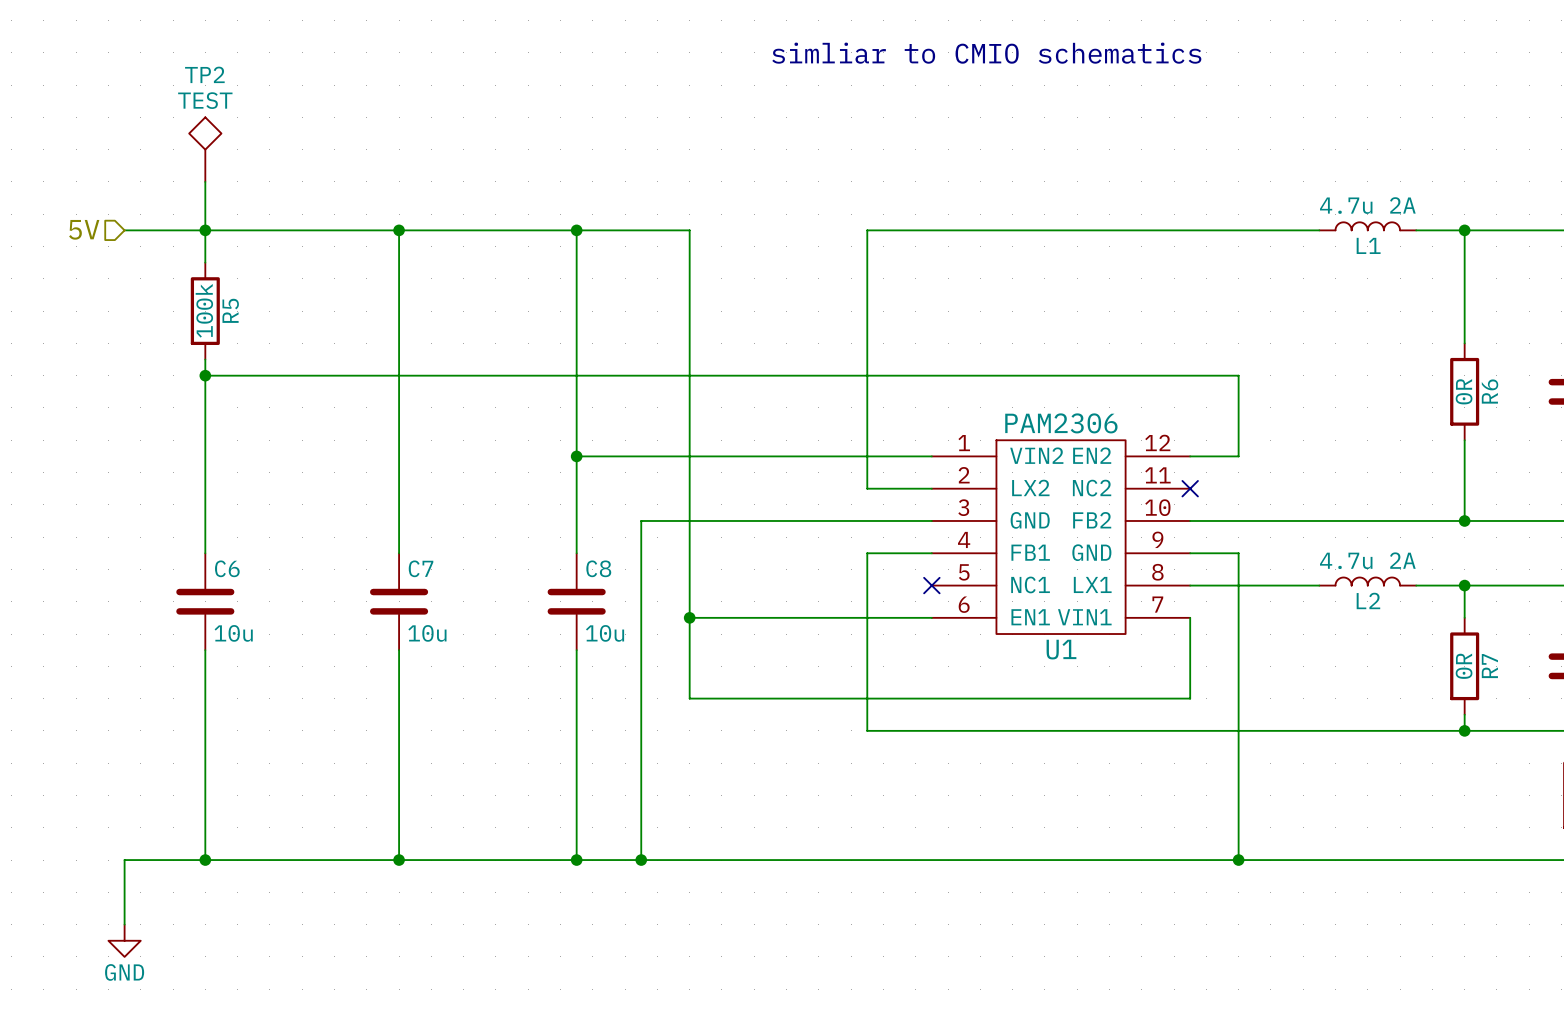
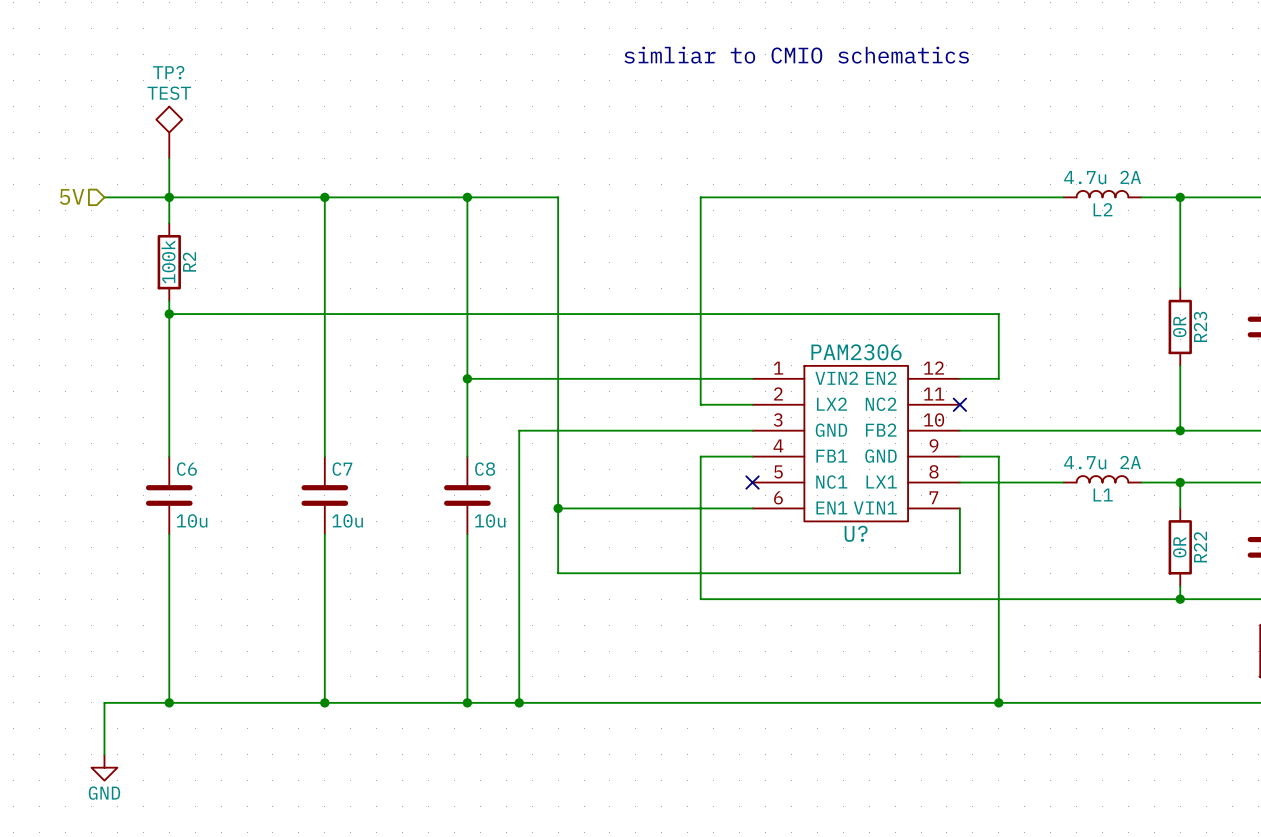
TP2 name: TP2 (204, 74) -> TP? (168, 72)
L1 name: L1 (1368, 245) -> L2 (1103, 209)
R5 name: R5 (230, 310) -> R2 (189, 261)
R6 name: R6 (1490, 391) -> R23 (1200, 326)
L2 name: L2 (1368, 600) -> L1 (1103, 495)
U1 name: U1 (1061, 649) -> U? (856, 533)
R7 name: R7 (1489, 666) -> R22 (1200, 547)

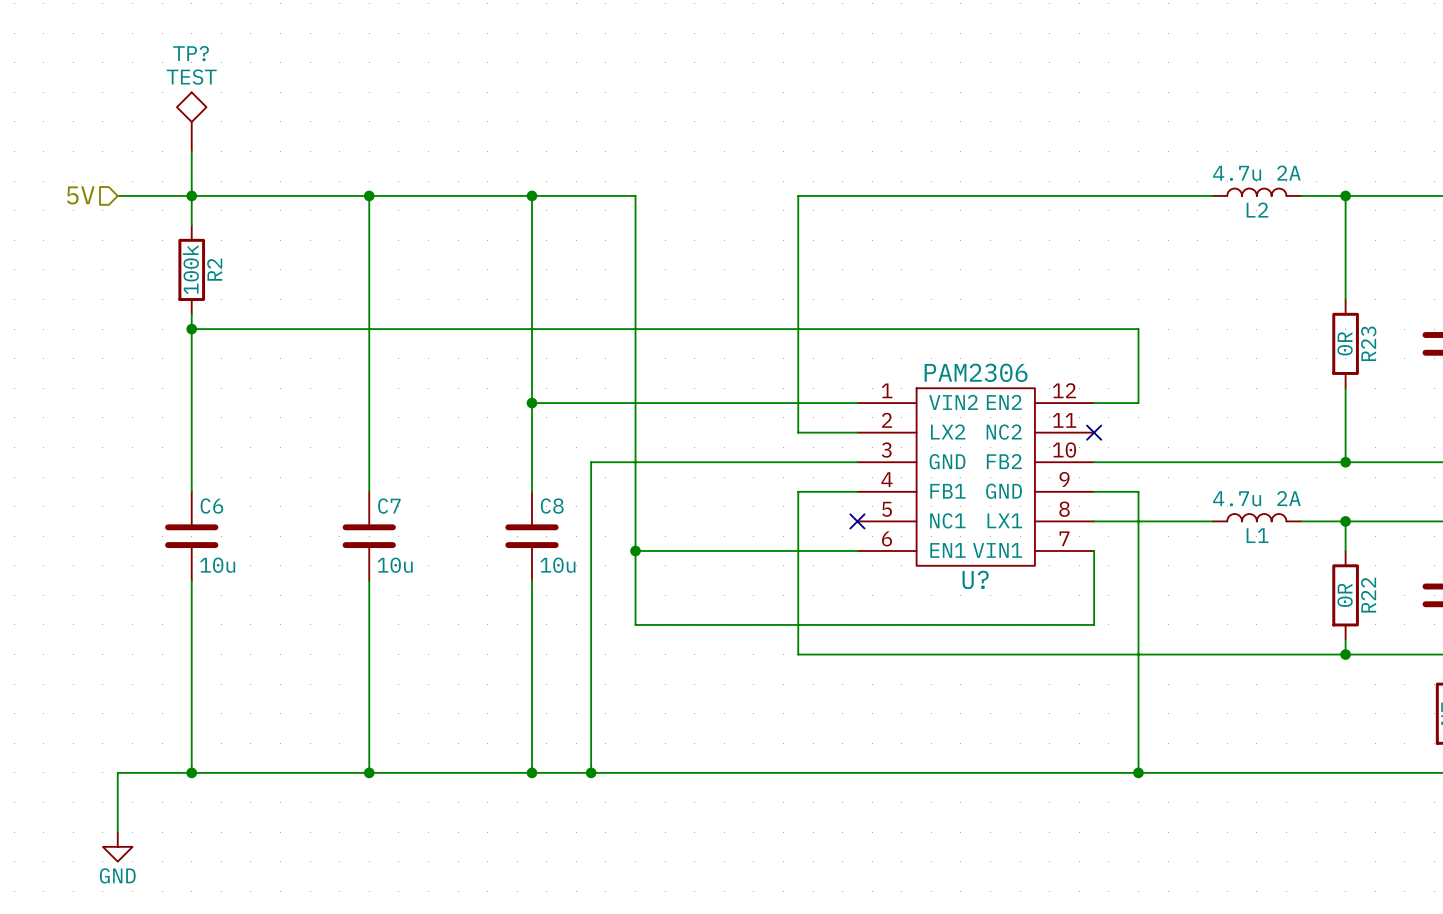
text: simliar to CMIO schematics (796, 55) -> none

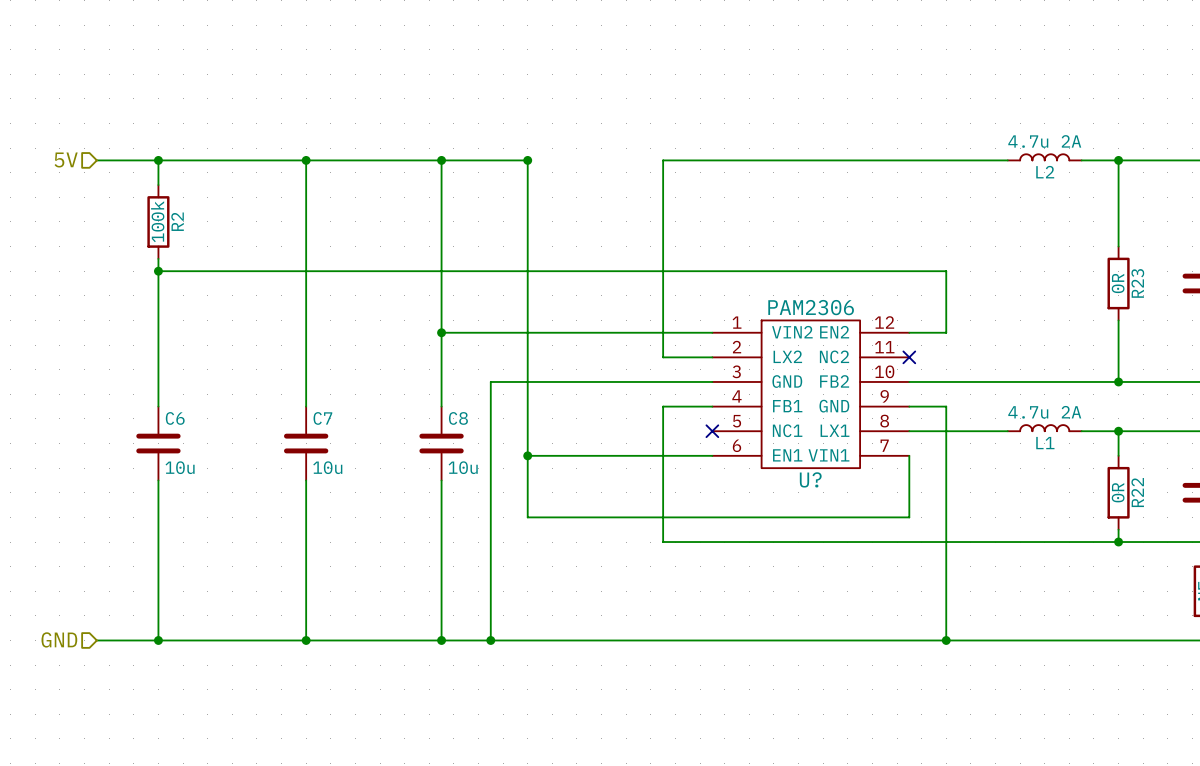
TP?: TEST (191, 121) -> none
wire: (191, 151) (191, 195) -> none
junction: none -> (527, 160)
hierarchical label: none -> GND (59, 639)
wire: (117, 772) (117, 832) -> none
power symbol: GND (117, 846) -> none

